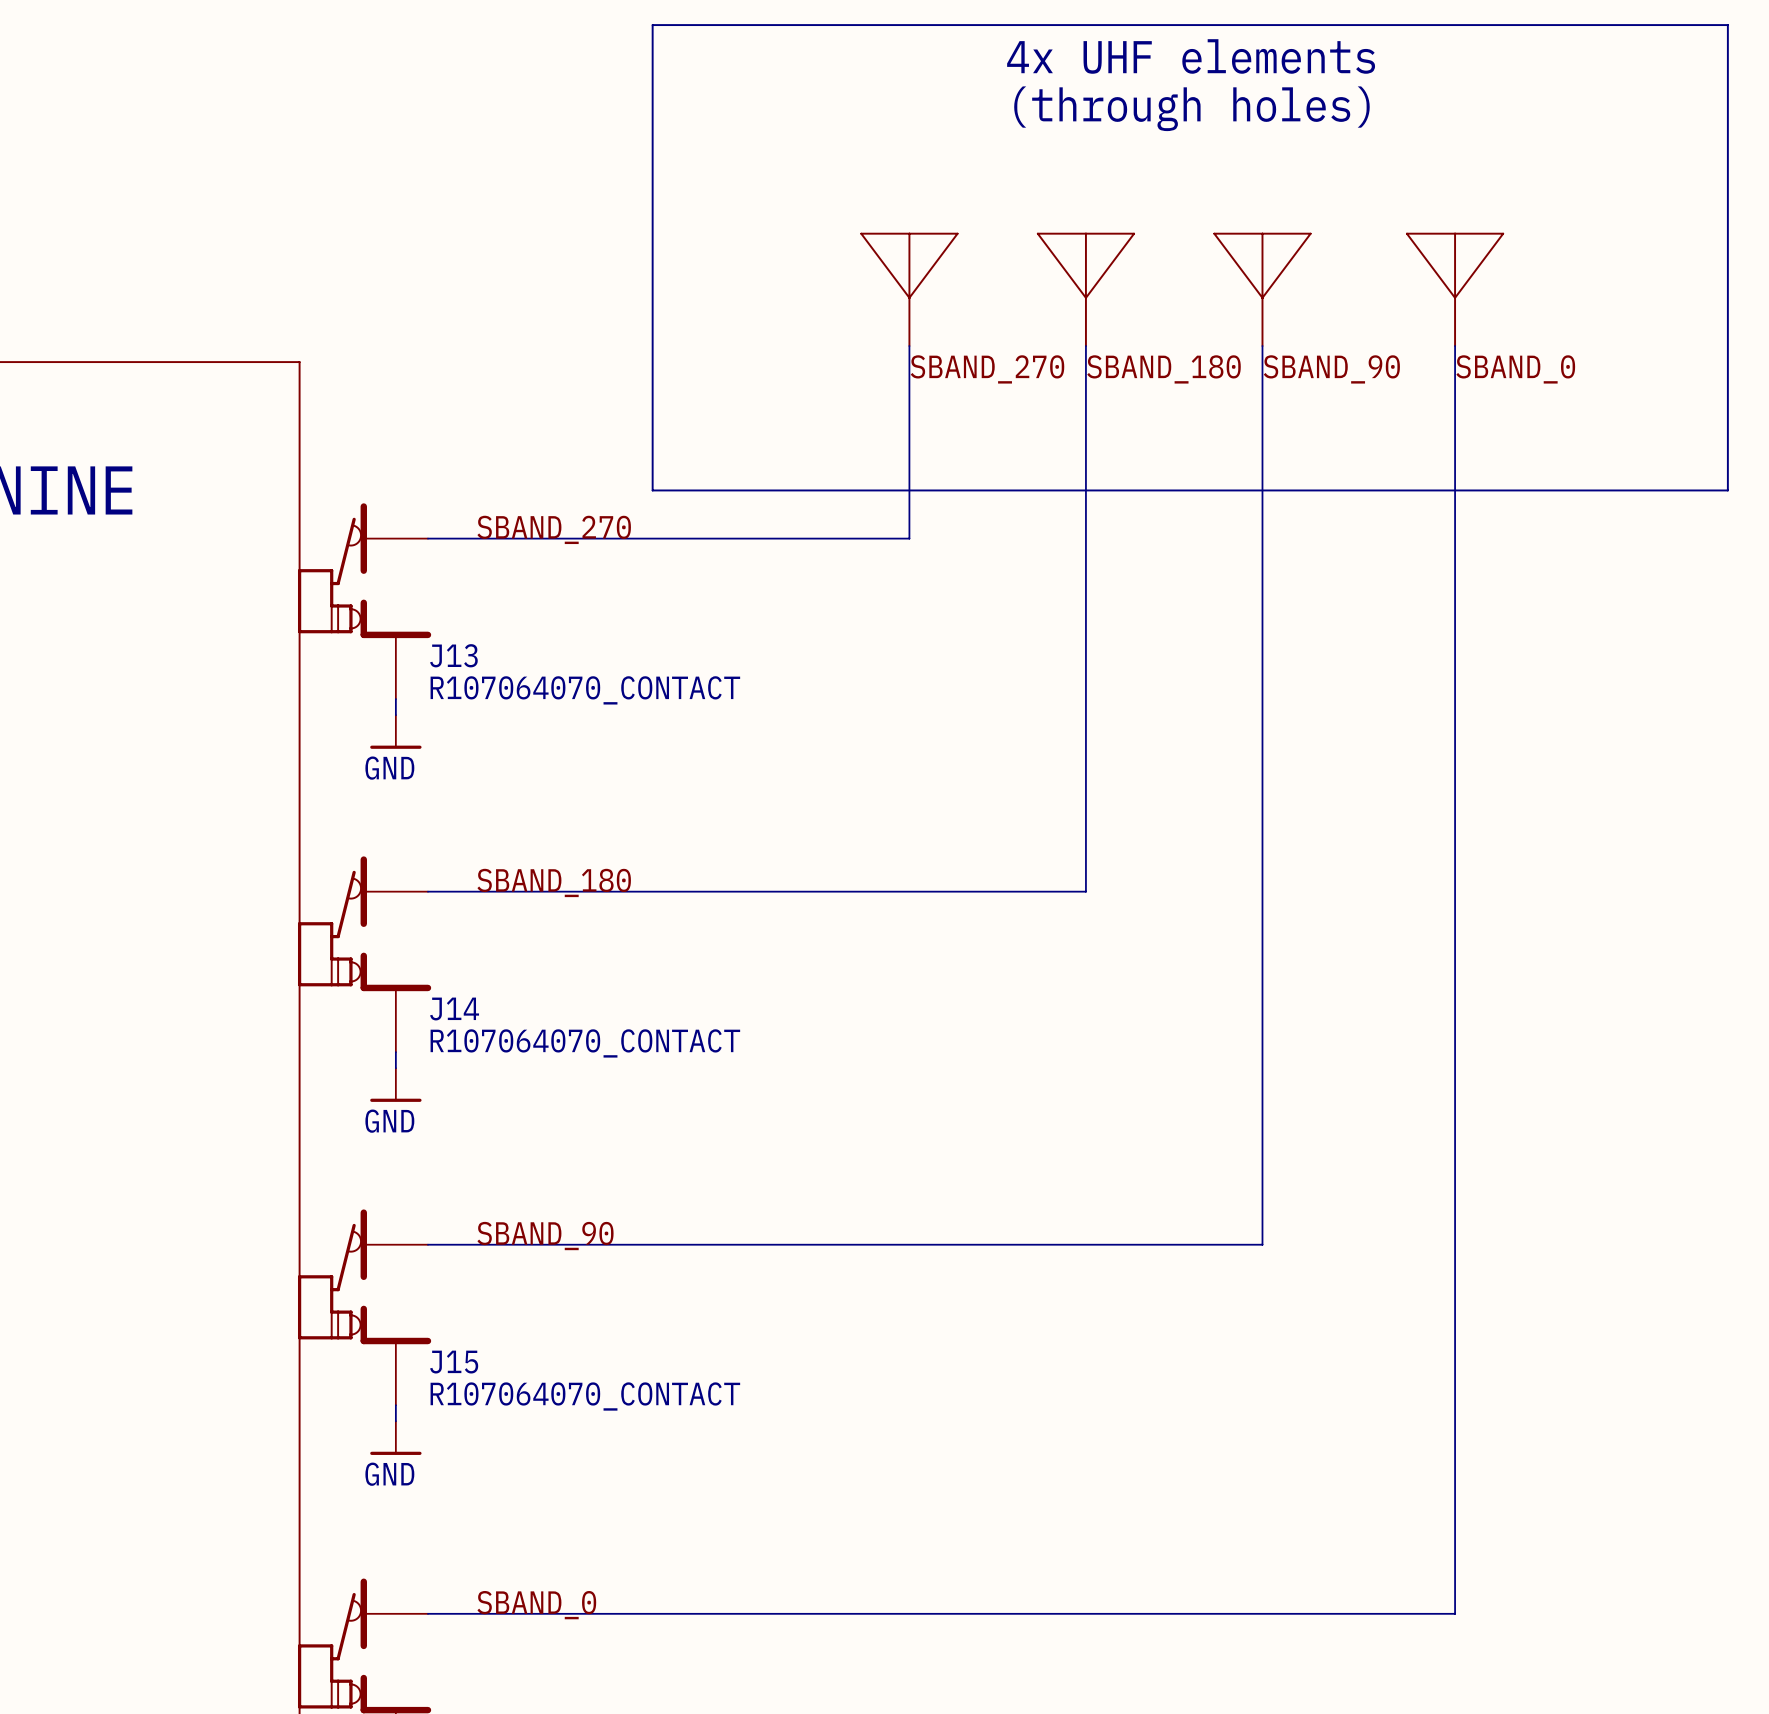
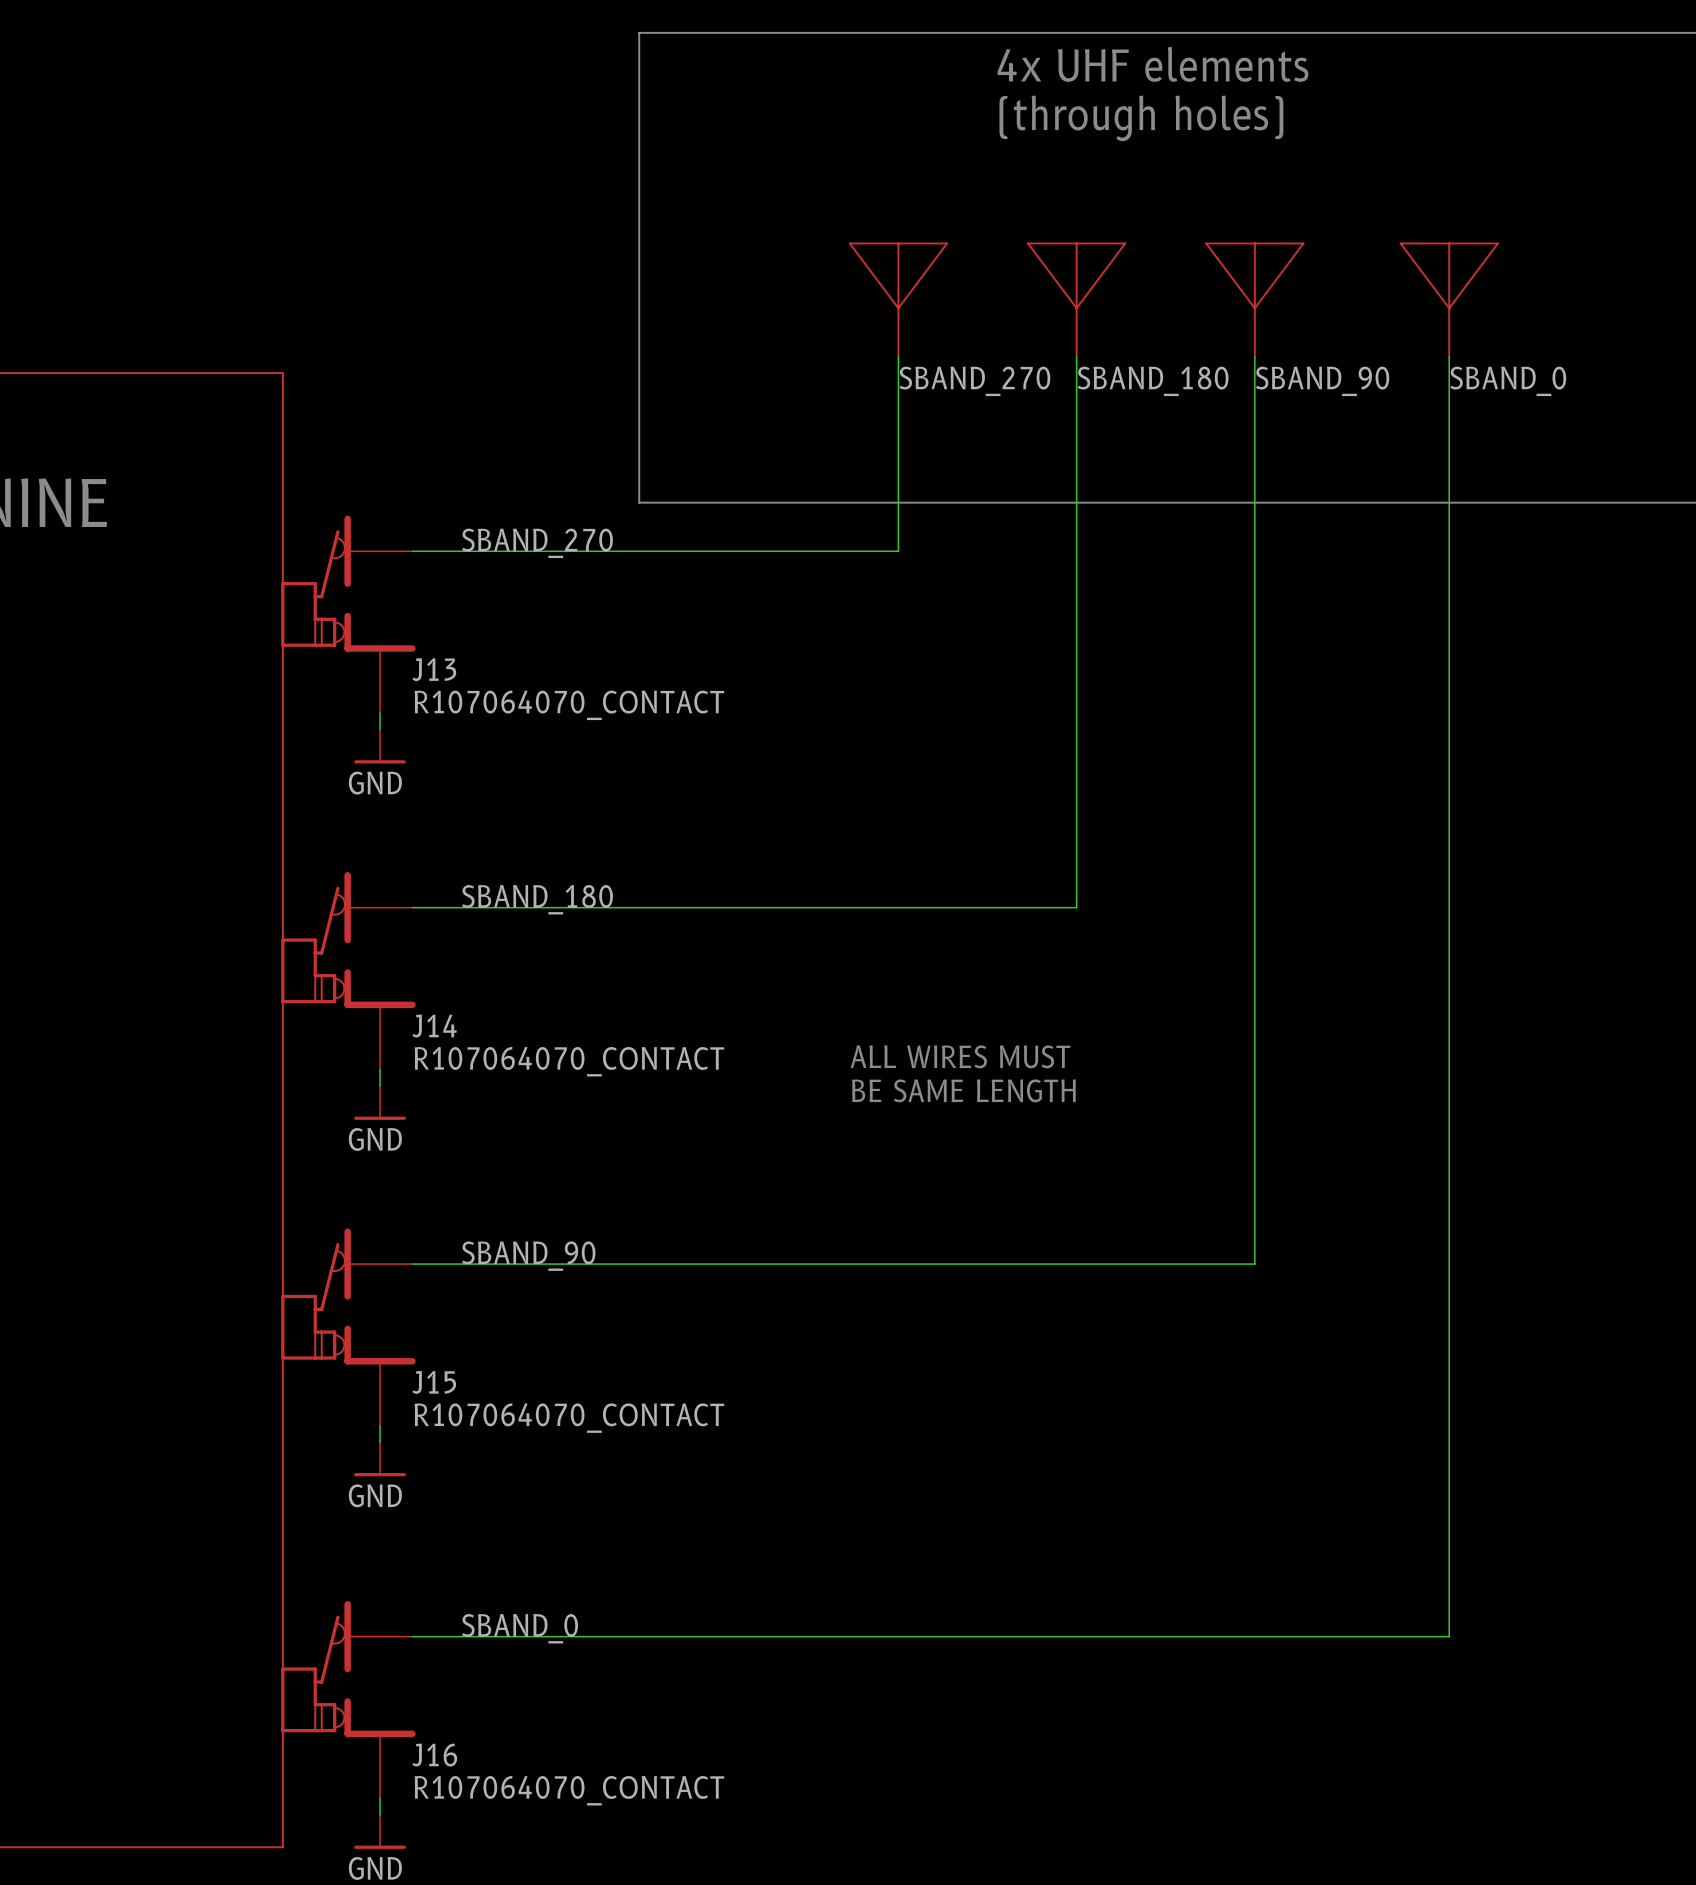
text: none -> ALL WIRES MUST (960, 1056)
text: none -> BE SAME LENGTH (963, 1090)

